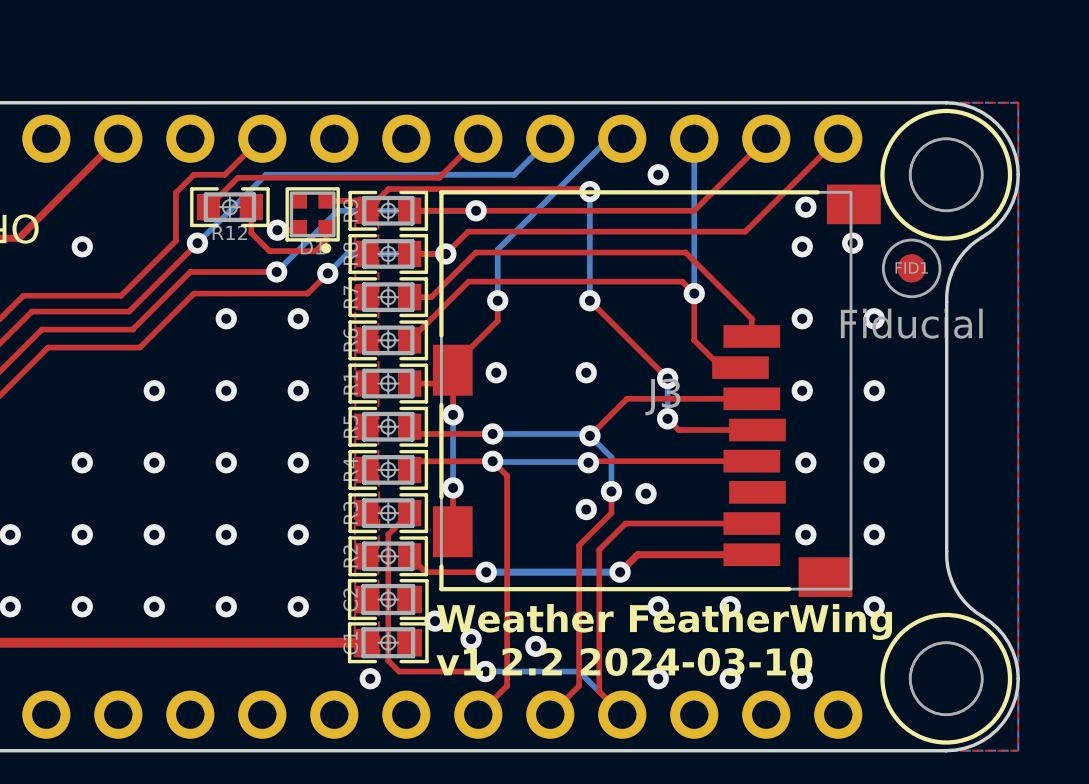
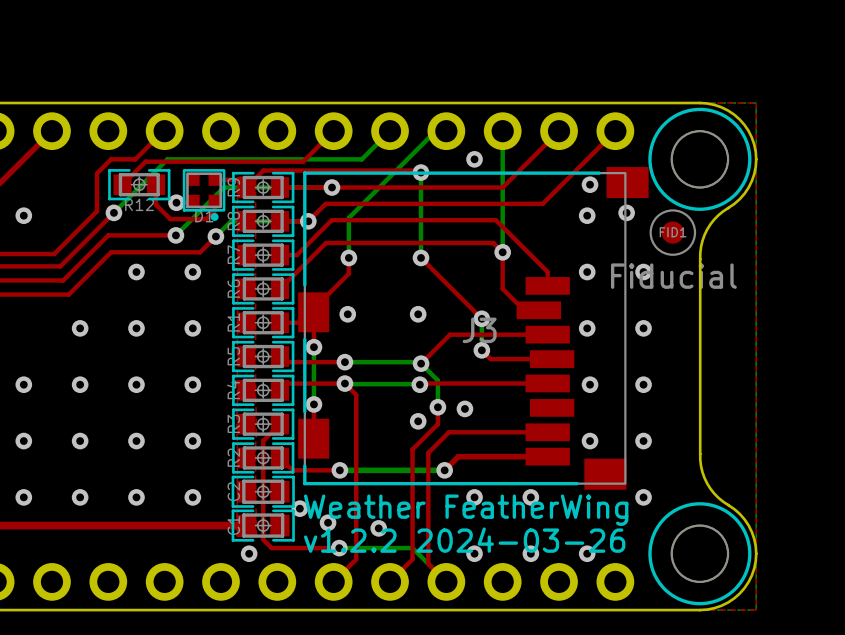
text: v1.2.2 2024-03-10 (624, 661) -> v1.2.2 2024-03-26 (464, 540)

